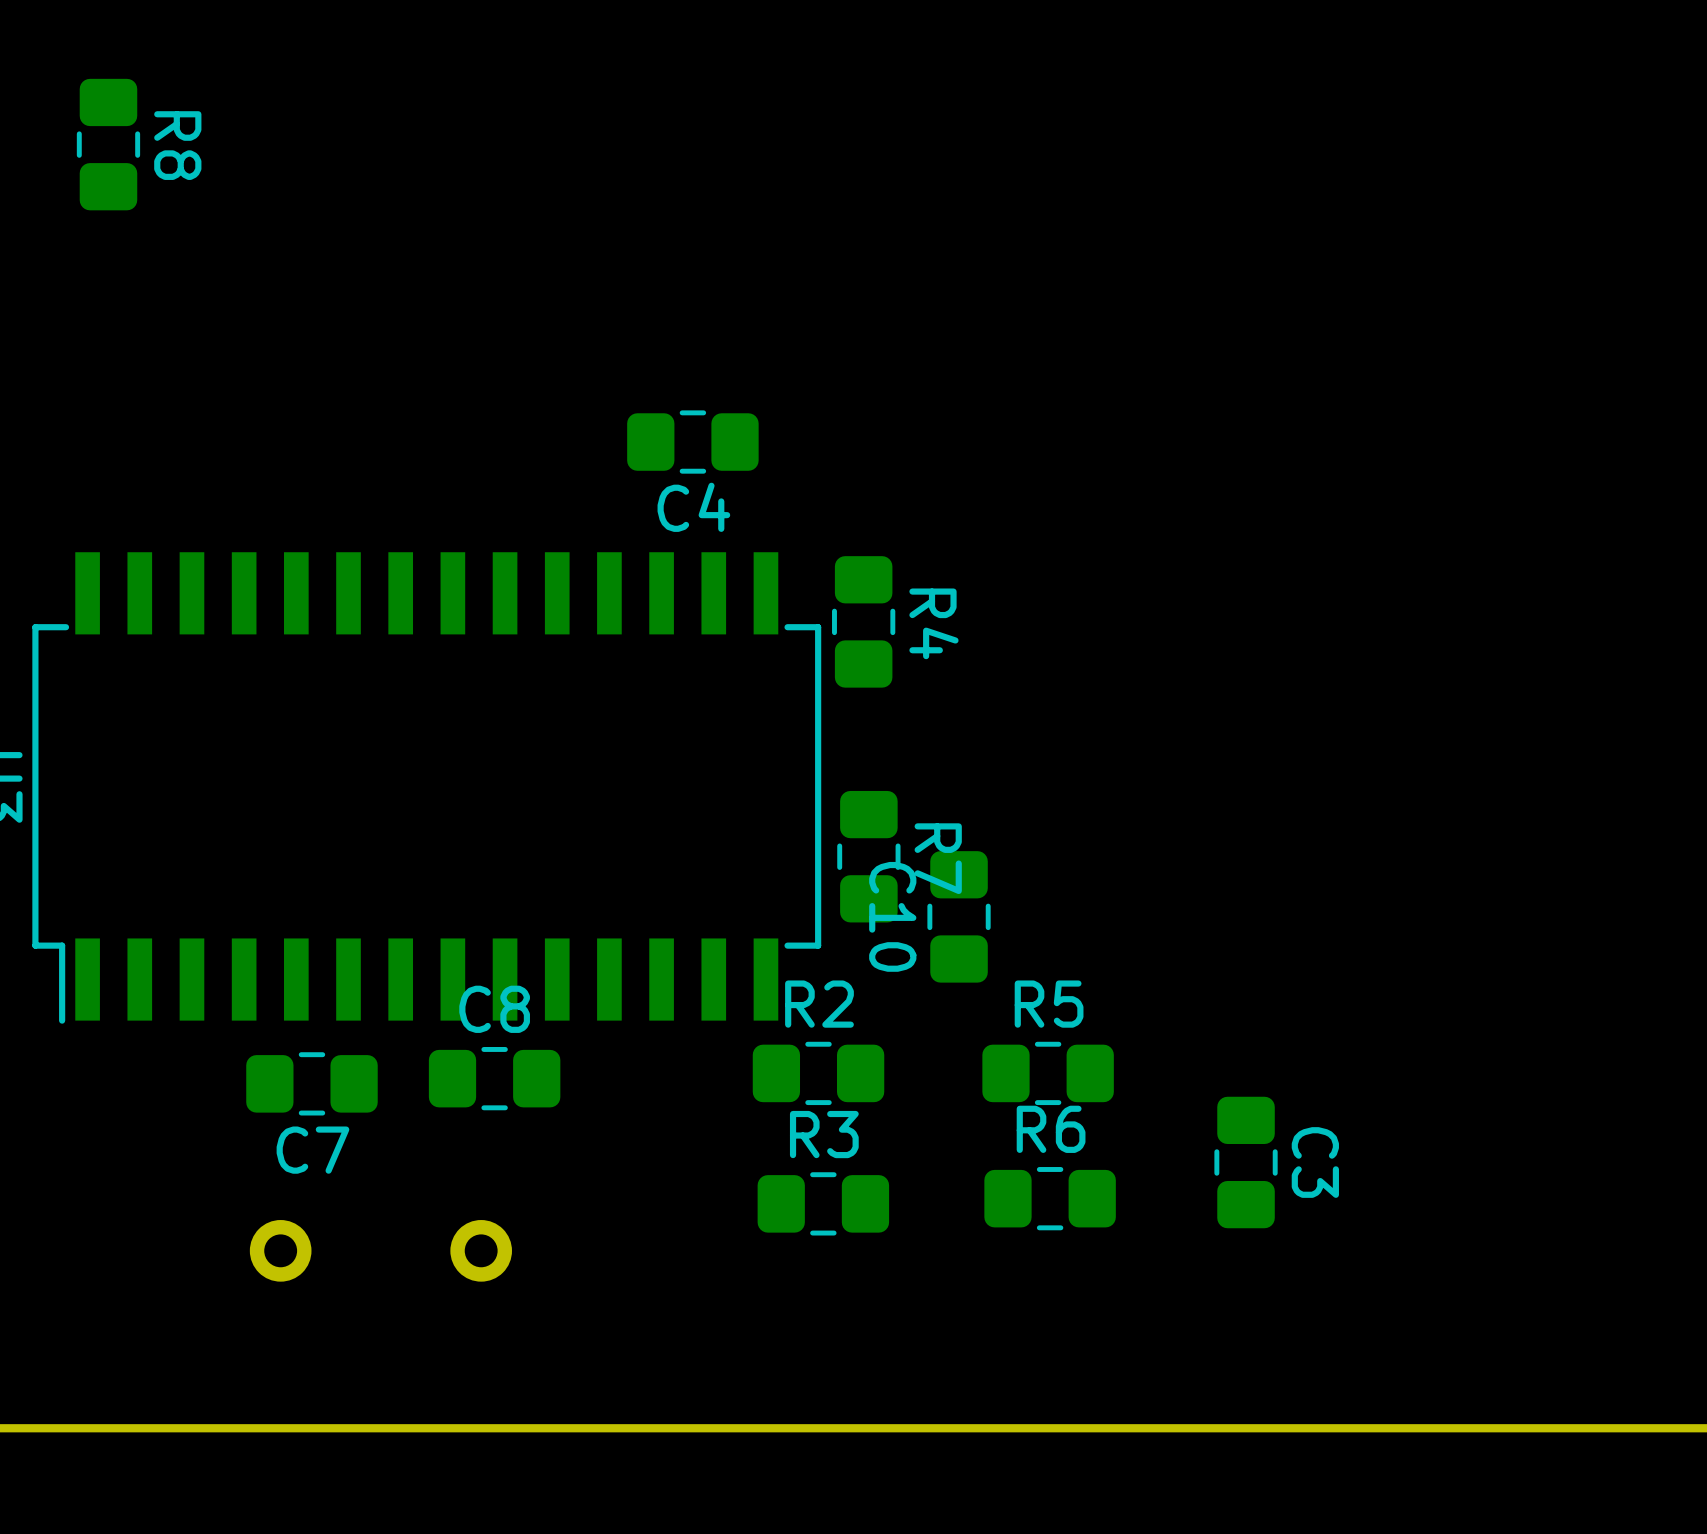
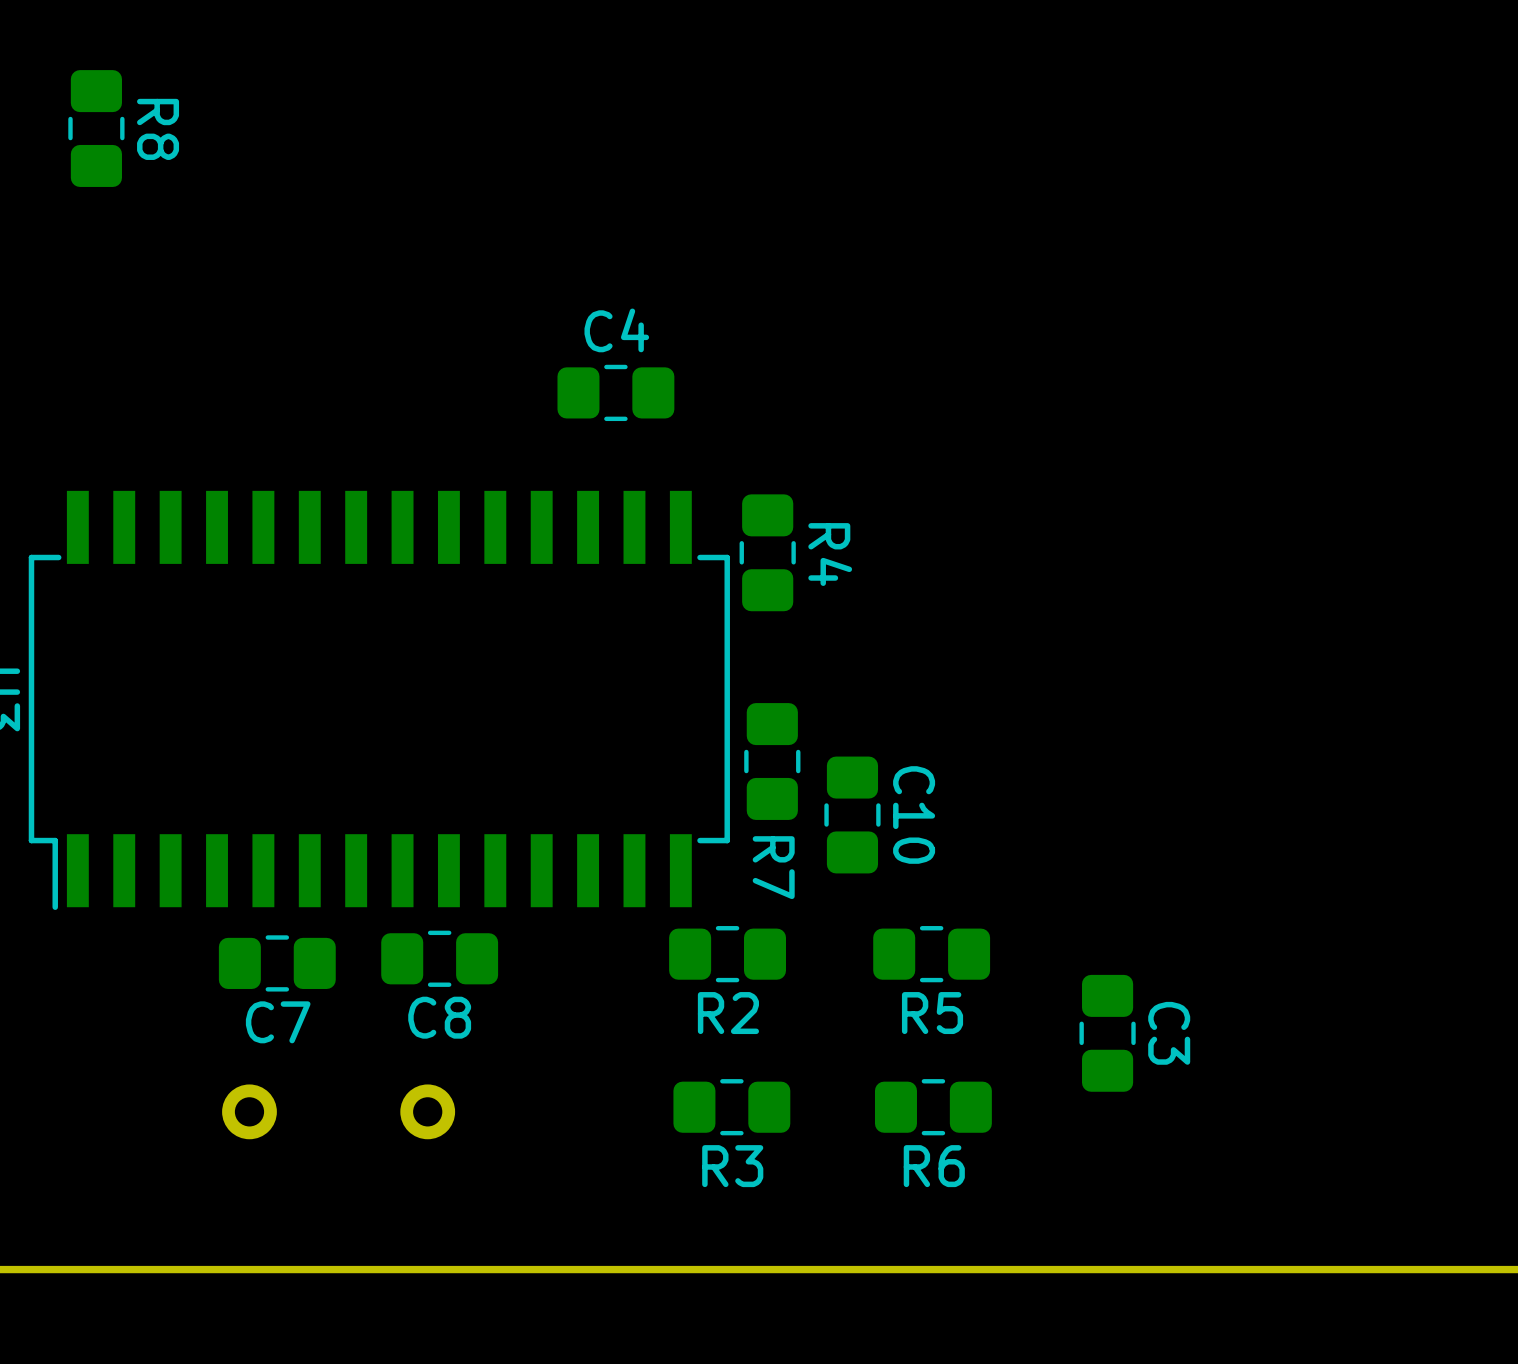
C4 name position: C4 (693, 507) -> C4 (616, 330)
R7 name position: R7 (938, 858) -> R7 (773, 867)
C10 name position: C10 (892, 916) -> C10 (914, 815)
R2 name position: R2 (819, 1004) -> R2 (728, 1013)
R5 name position: R5 (1049, 1004) -> R5 (932, 1013)
C8 name position: C8 (494, 1009) -> C8 (439, 1017)
R6 name position: R6 (1051, 1129) -> R6 (934, 1166)
R3 name position: R3 (824, 1134) -> R3 (732, 1166)
R6 position: (1050, 1198) -> (933, 1107)
R3 position: (823, 1203) -> (731, 1107)

